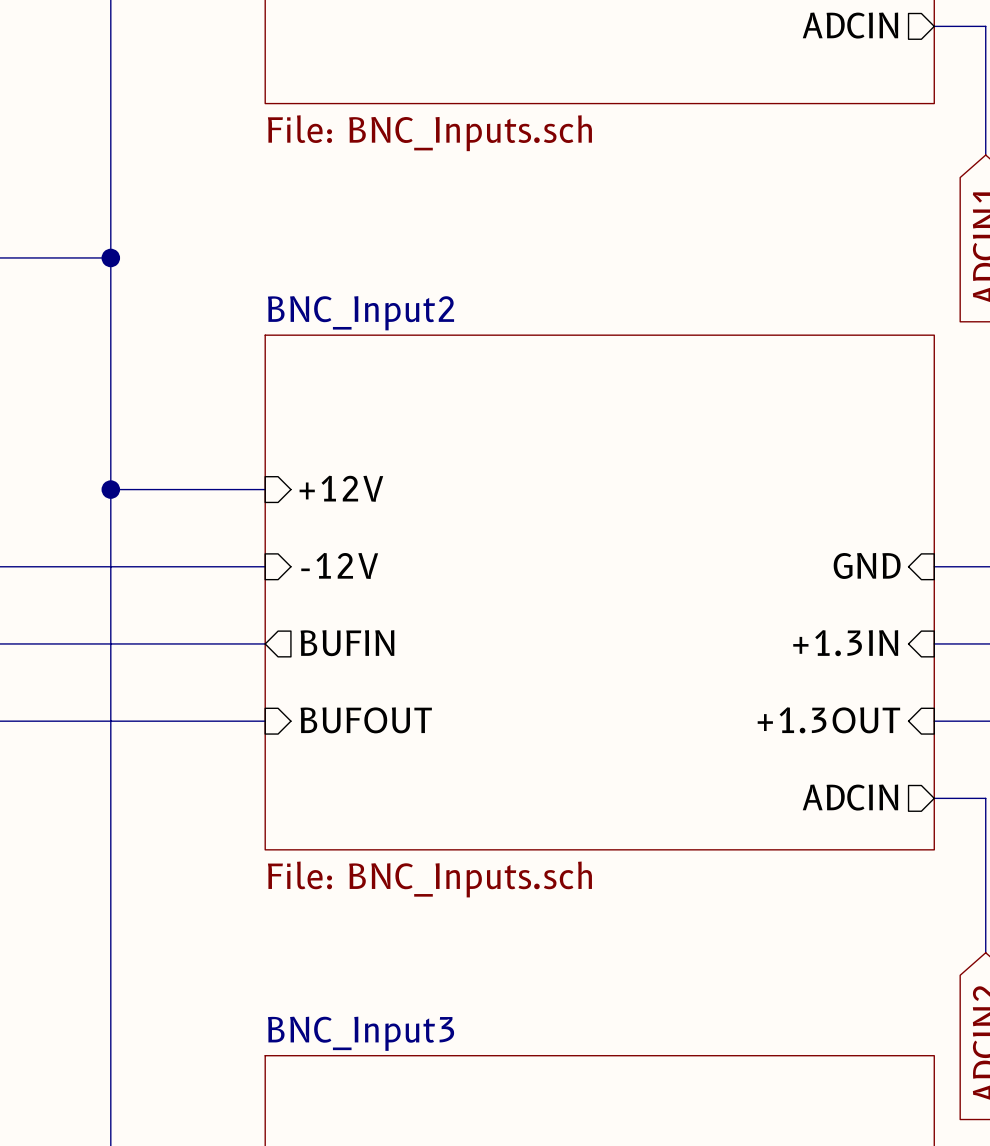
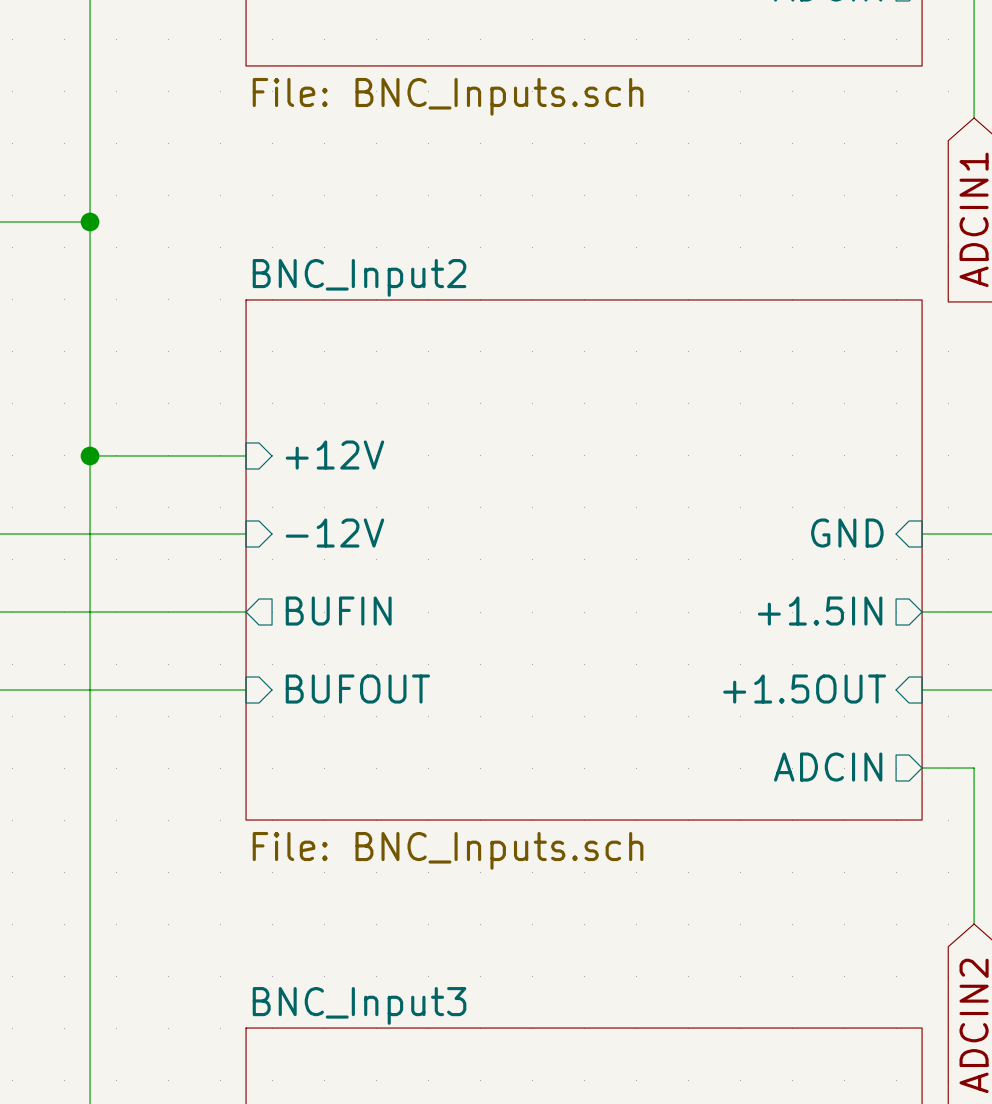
sheet pin shape: input (845, 643) -> output (820, 611)
sheet pin: +1.3IN (845, 643) -> +1.5IN (820, 611)
sheet pin: +1.3OUT (828, 720) -> +1.5OUT (804, 689)

